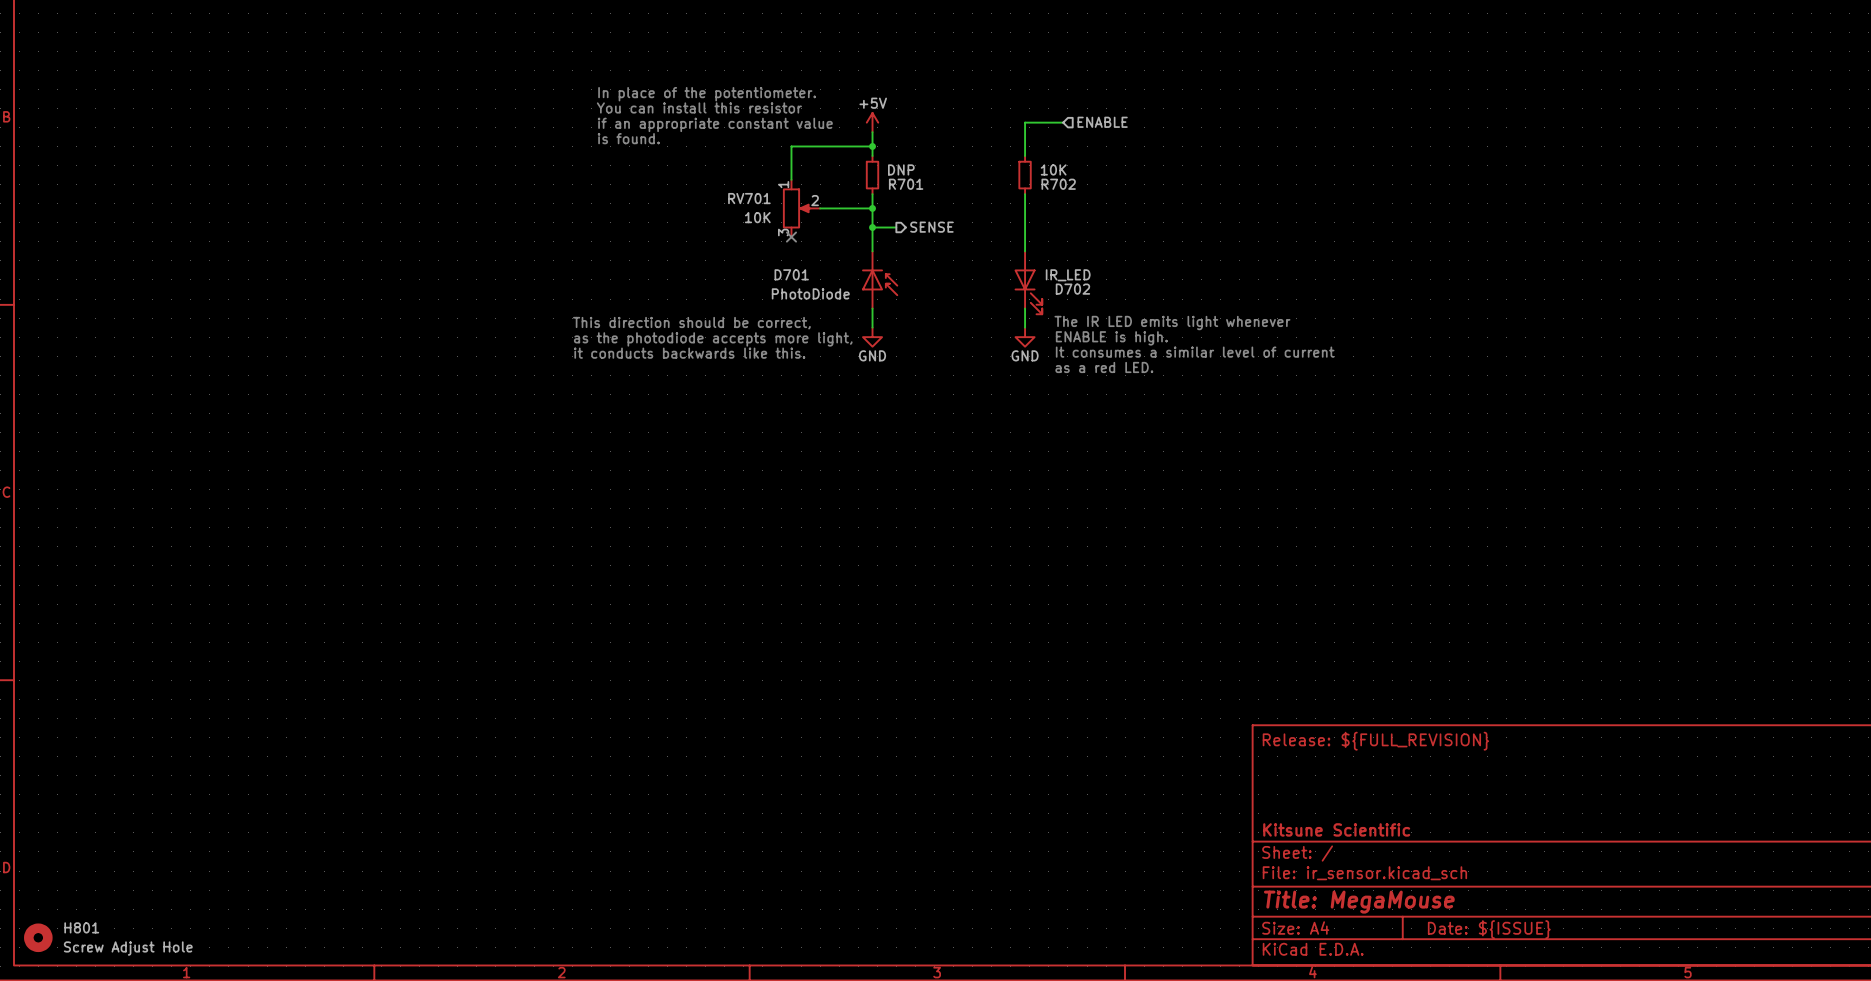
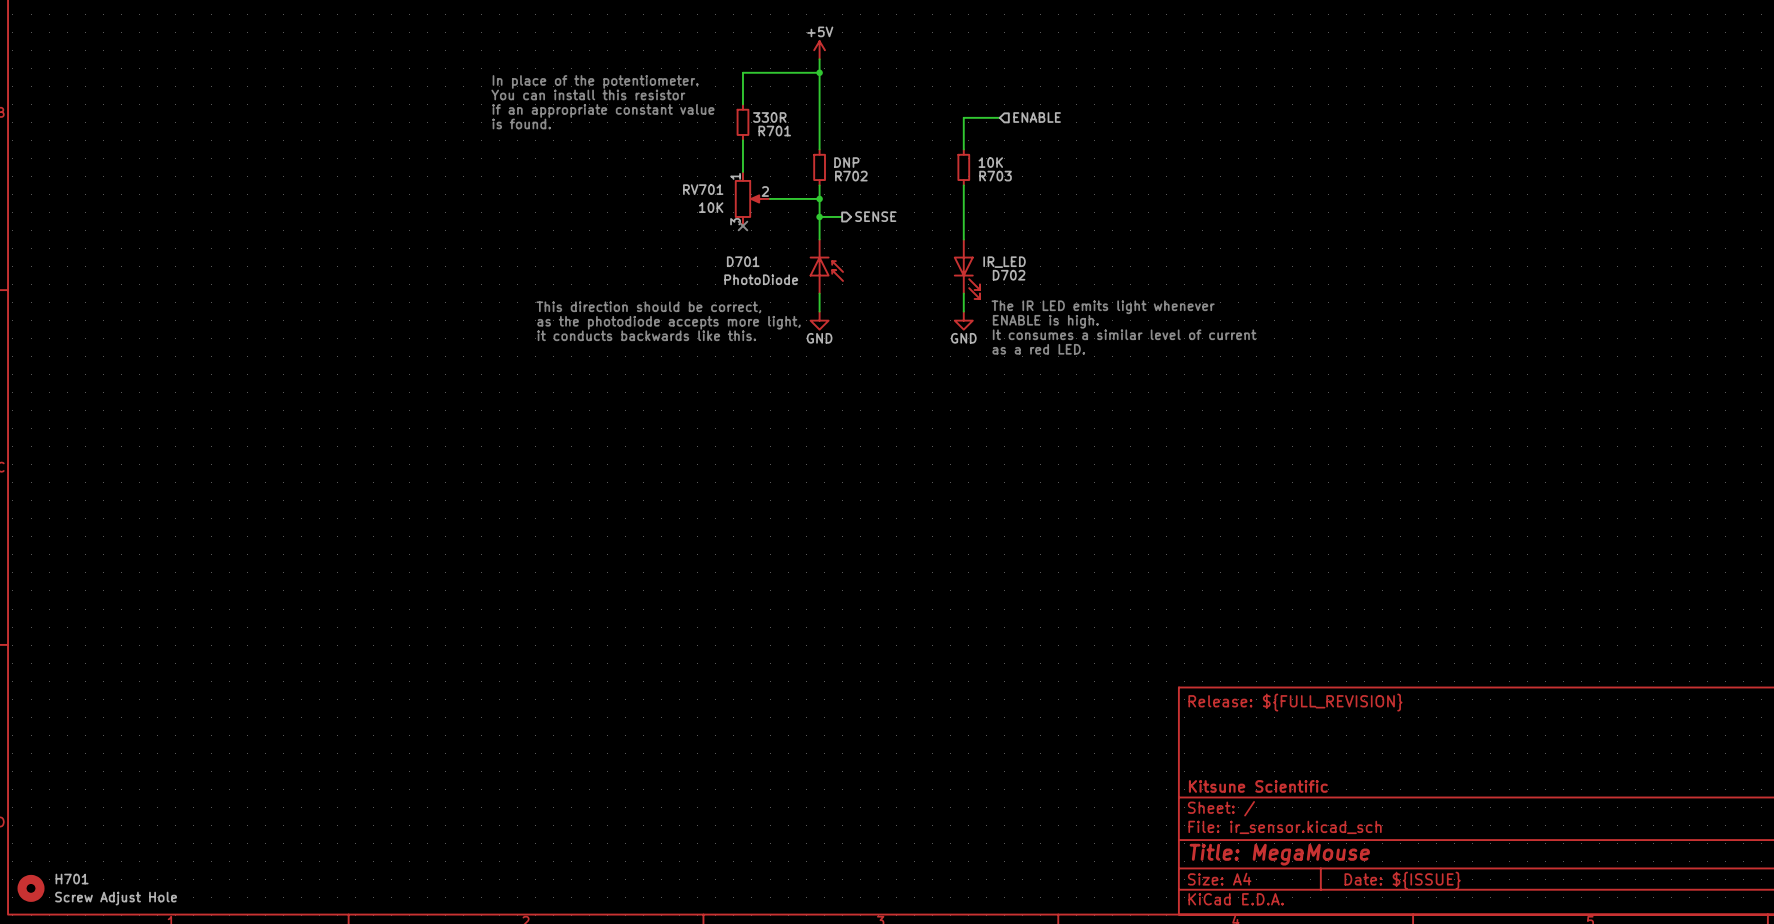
wire: none -> (819, 59) (819, 126)
wire: none -> (819, 72) (742, 72) (742, 104)
junction: none -> (819, 72)
text position: In place of the potentiometer. (707, 94) -> In place of the potentiometer. (595, 81)
text position: You can install this resistor (699, 107) -> You can install this resistor (588, 94)
power symbol position: +5V (872, 122) -> +5V (819, 50)
text position: if an appropriate constant value (715, 124) -> if an appropriate constant value (603, 110)
R701: none -> 330R (742, 122)
text position: is found. (628, 138) -> is found. (521, 123)
wire: (791, 146) (872, 146) -> none
junction: (872, 146) -> none
R701 name: R701 (906, 184) -> R702 (851, 176)
R702 name: R702 (1058, 184) -> R703 (995, 176)
H801 name: H801 (81, 927) -> H701 (72, 879)

